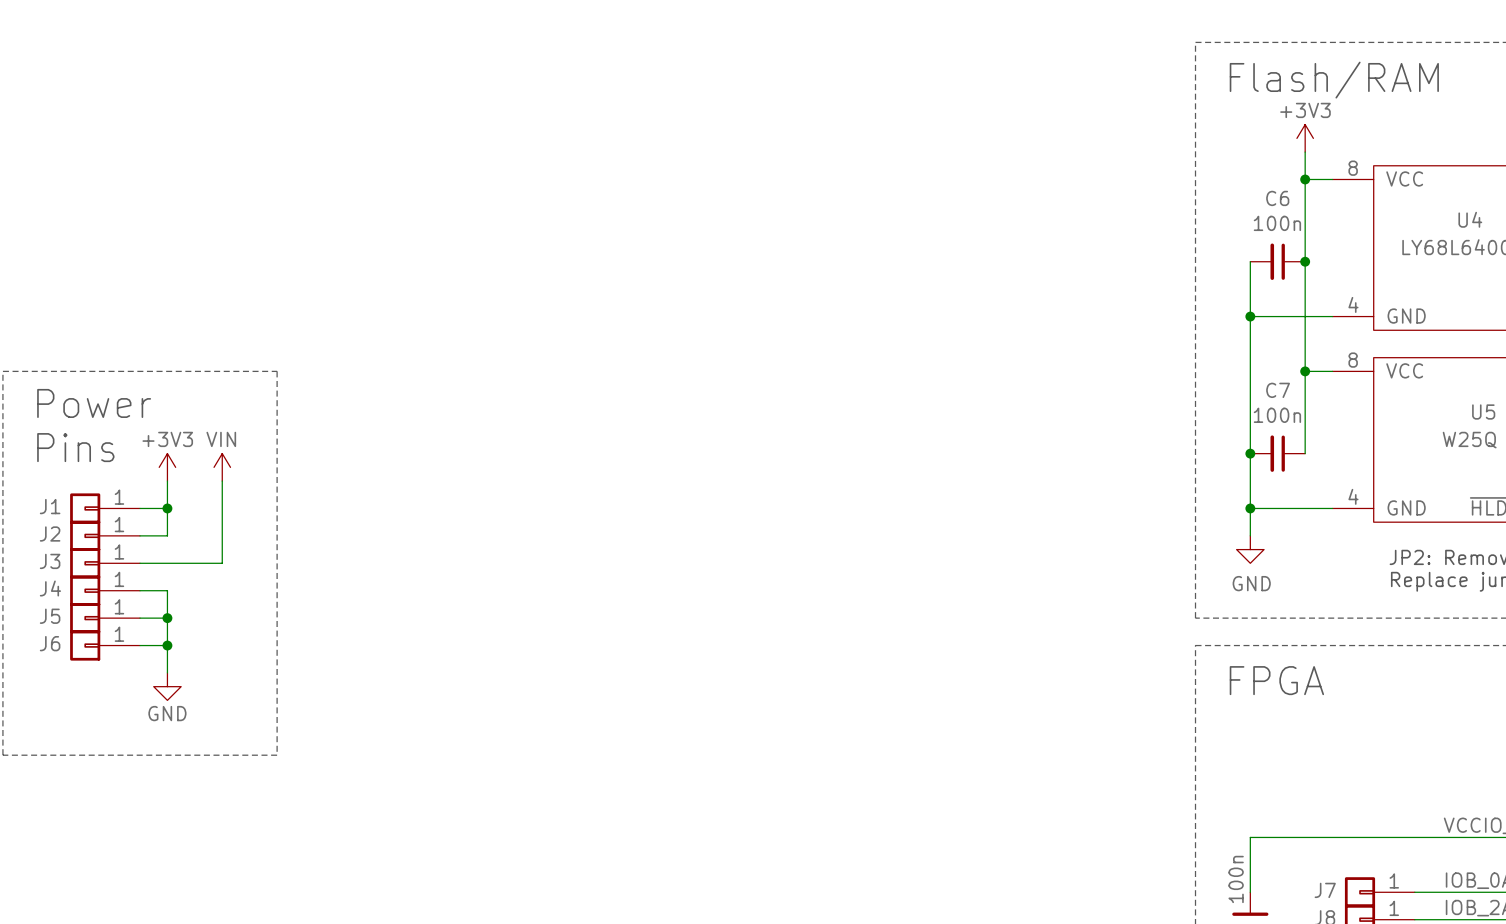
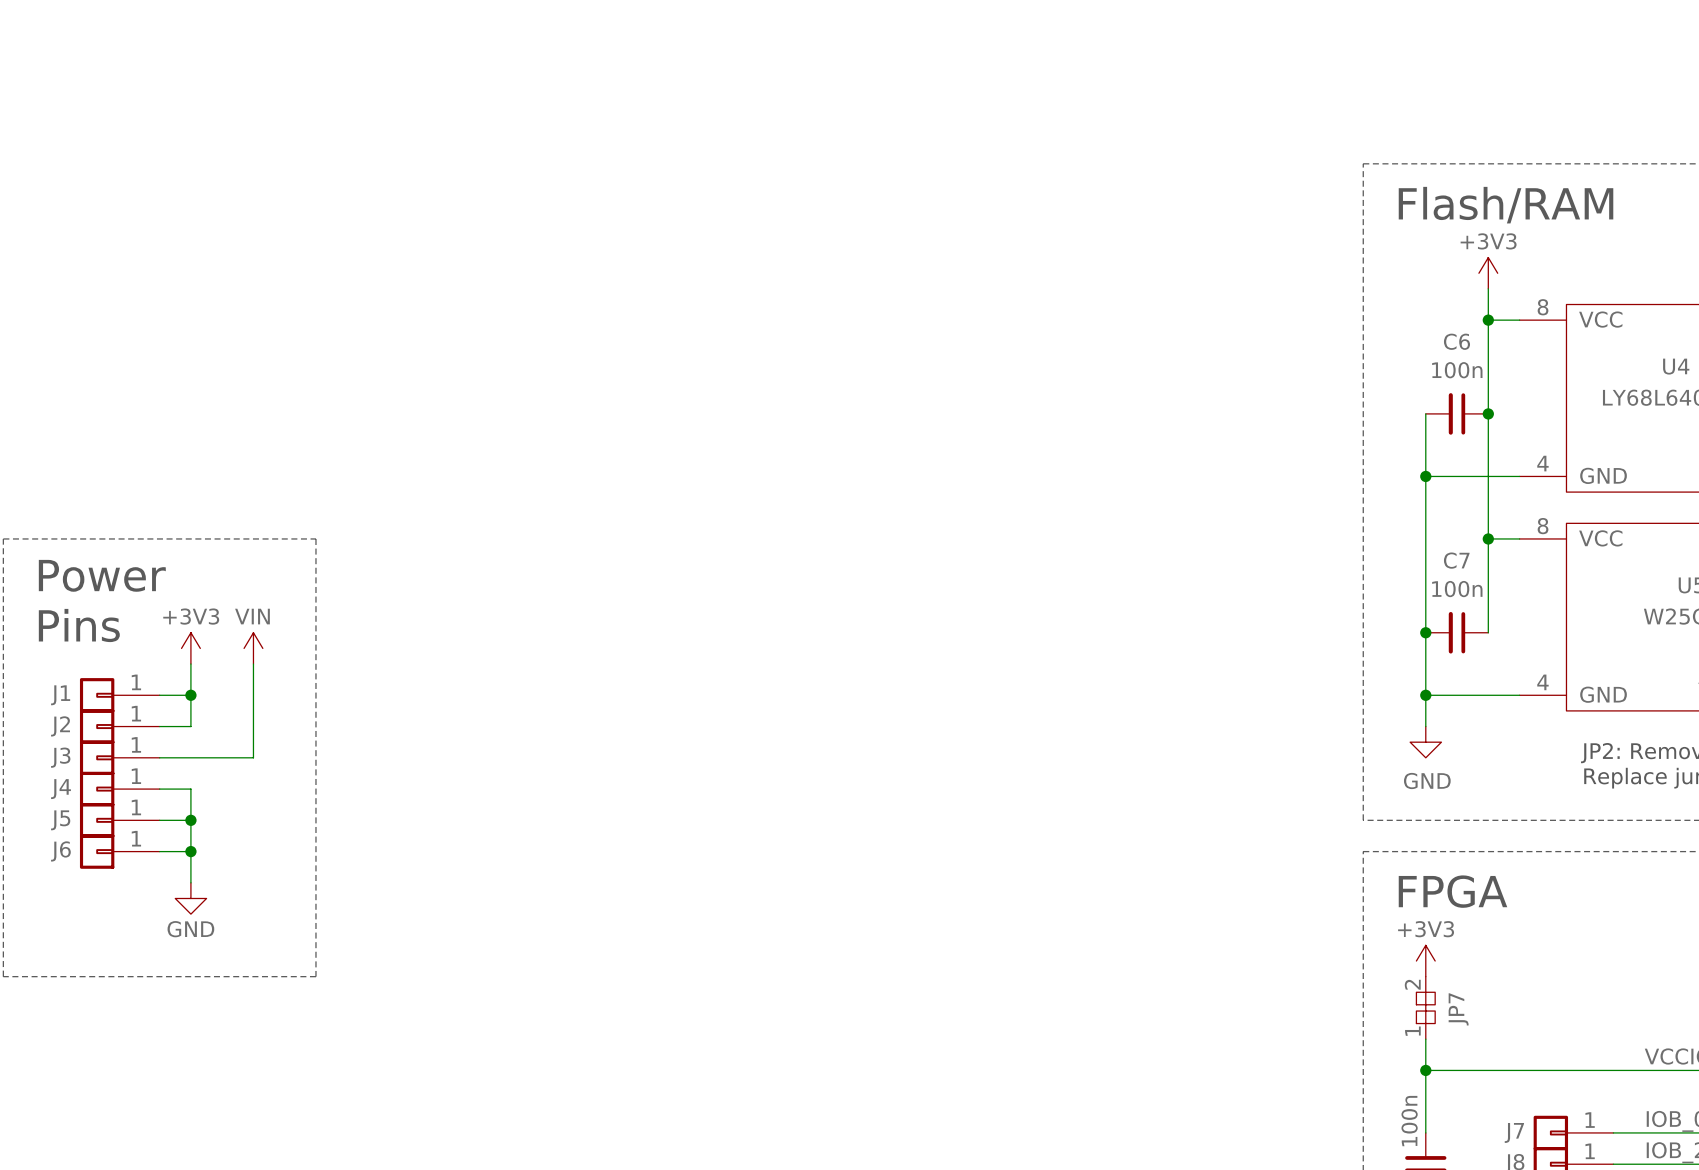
power symbol: none -> +3V3 (1425, 961)
JP7: none -> (1425, 1007)
wire: none -> (1425, 1039) (1425, 1070)
junction: none -> (1425, 1070)

